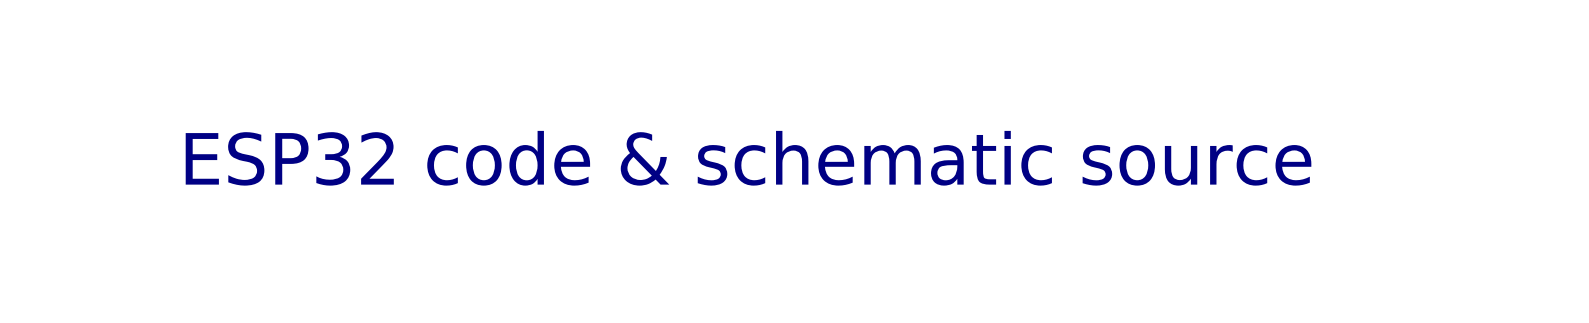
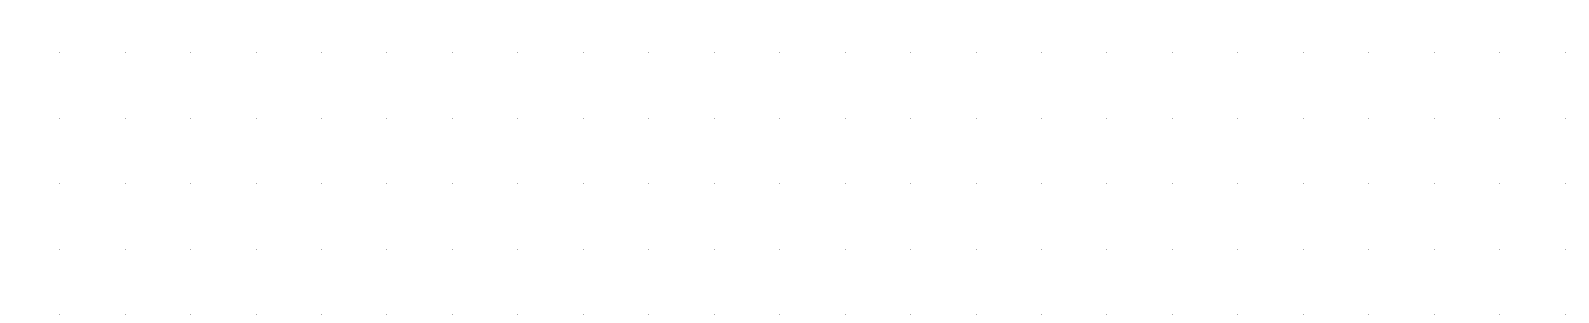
text: ESP32 code & schematic source (748, 158) -> none

